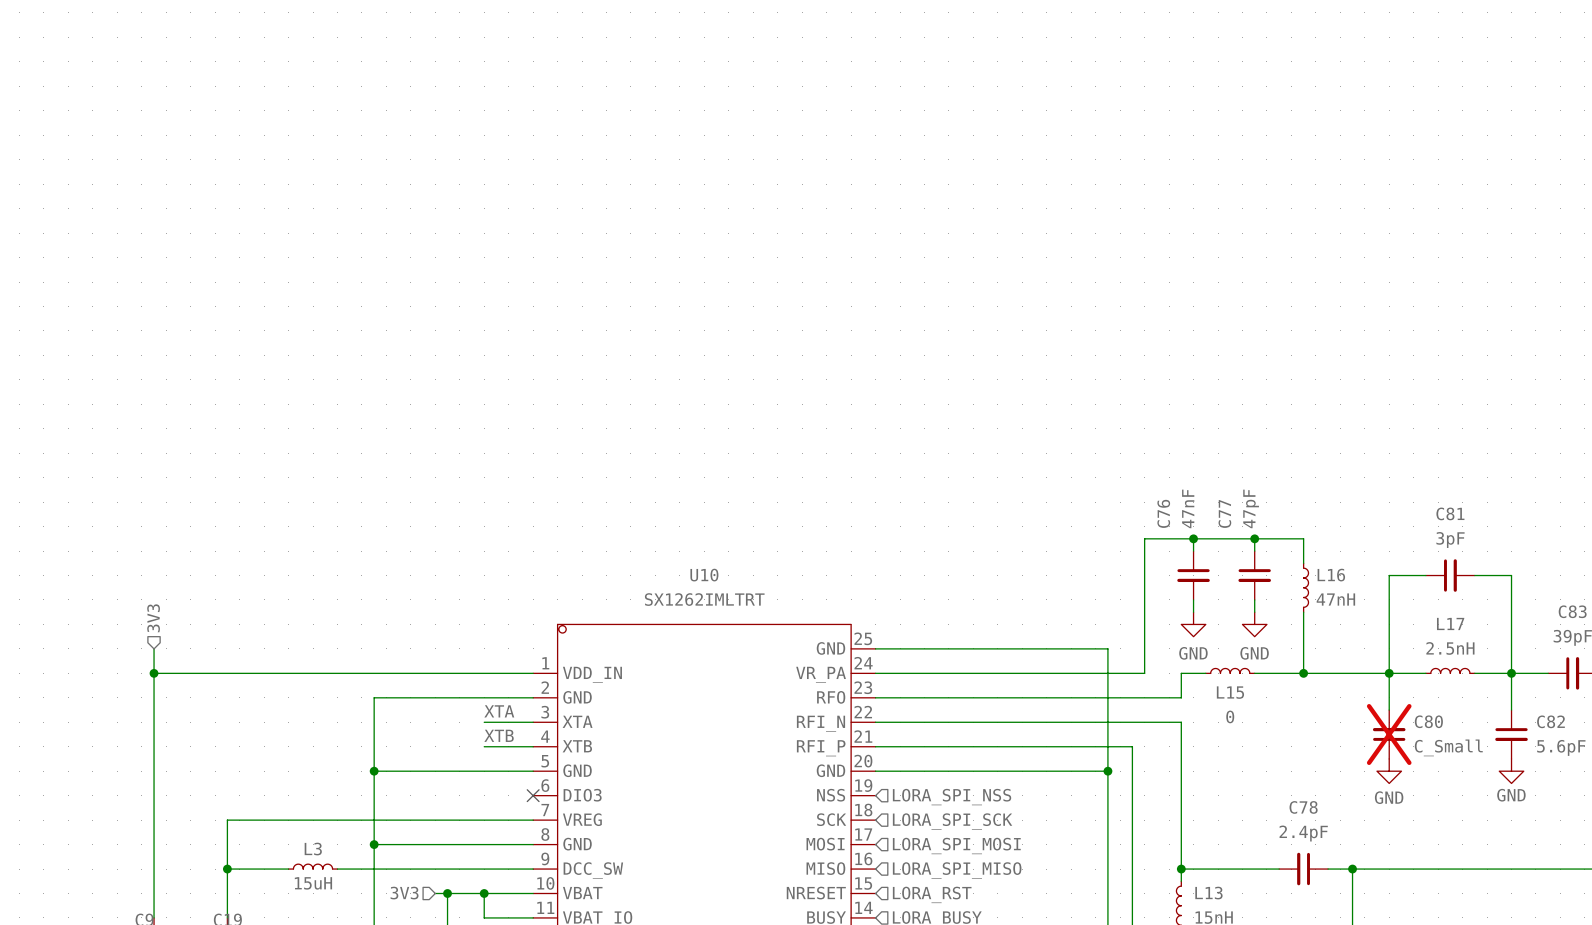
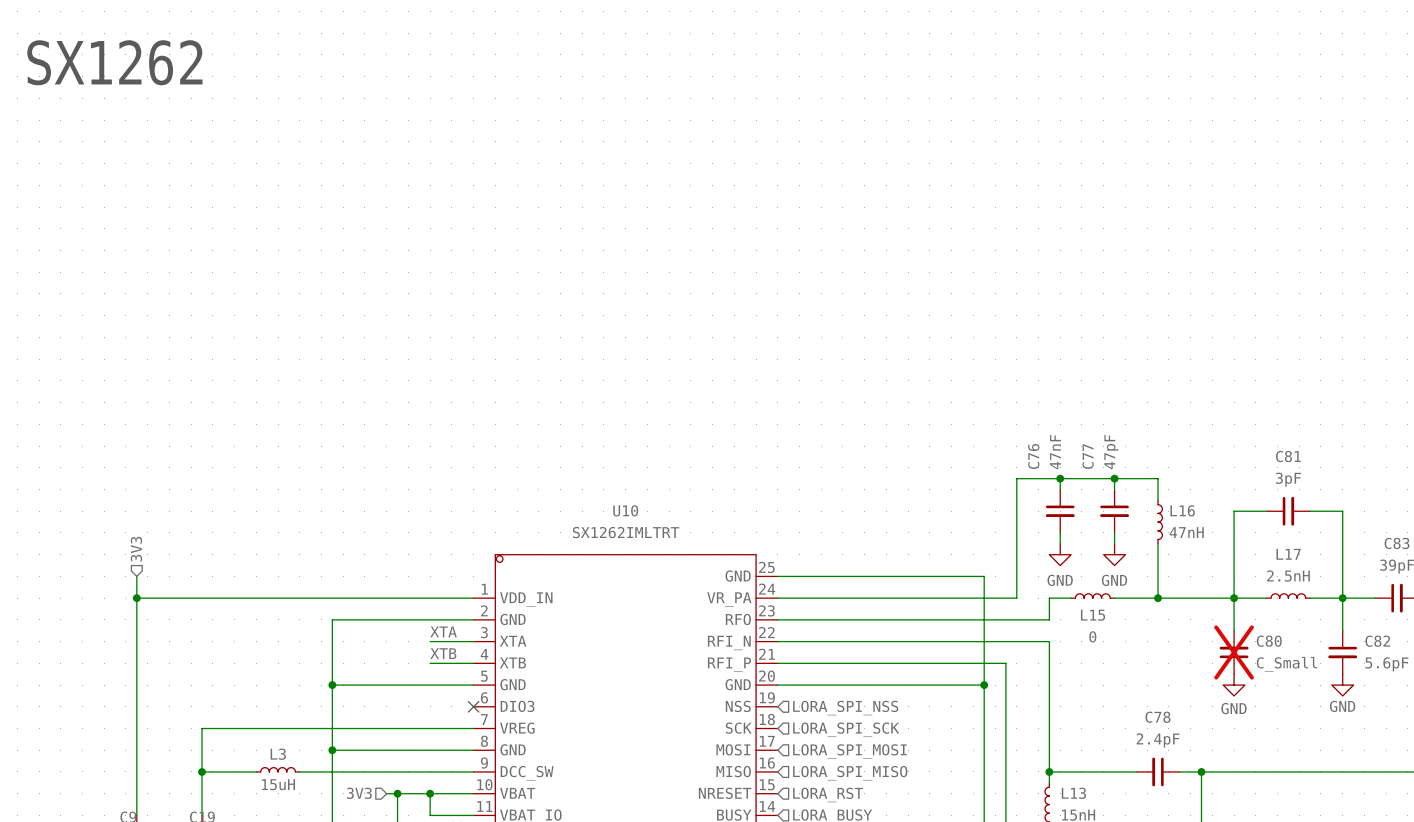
text: none -> SX1262 (114, 62)

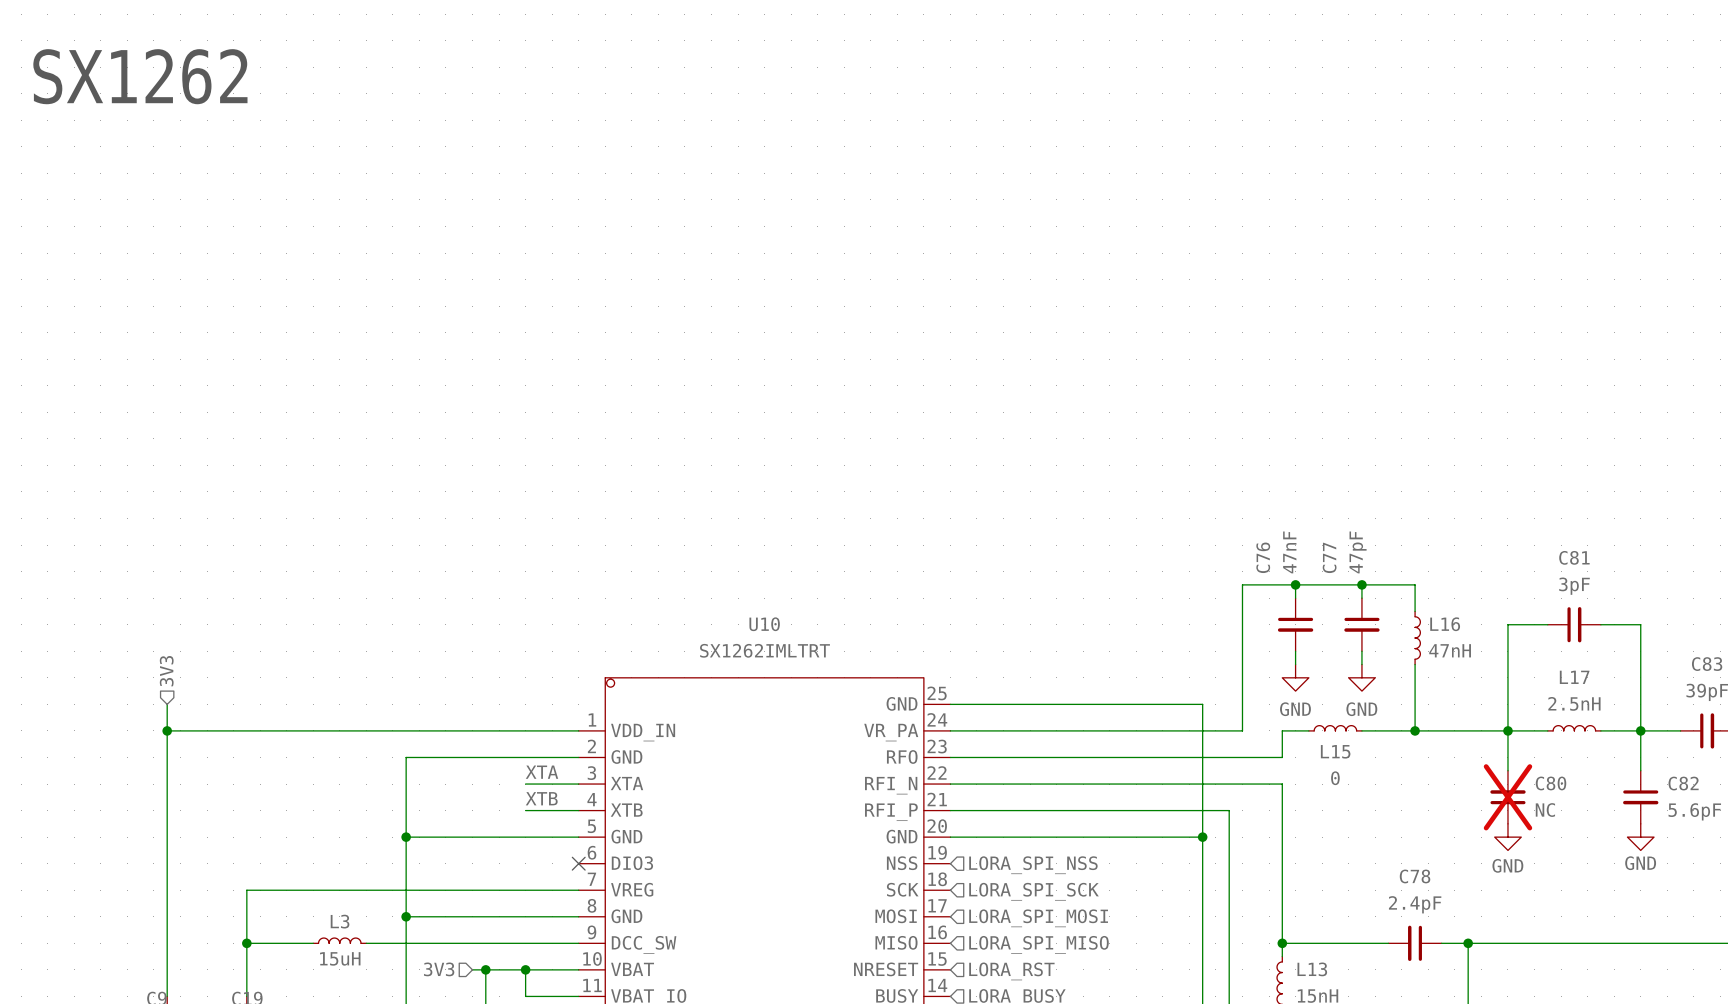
C80 value: C_Small (1286, 664) -> NC (1545, 810)

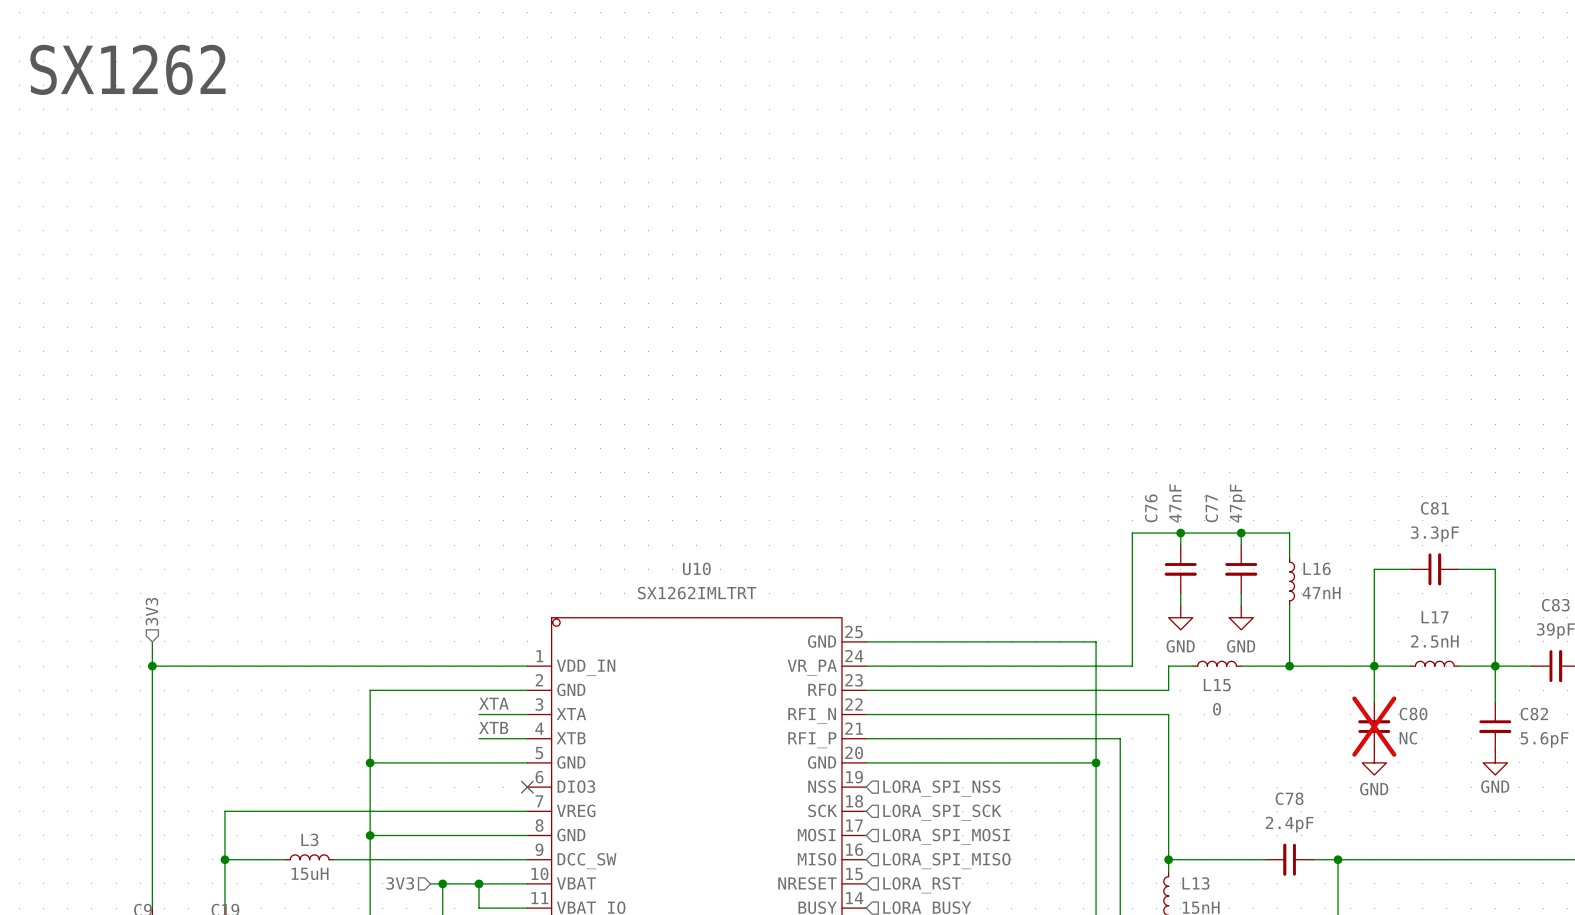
C81 value: 3pF (1574, 586) -> 3.3pF (1434, 534)

